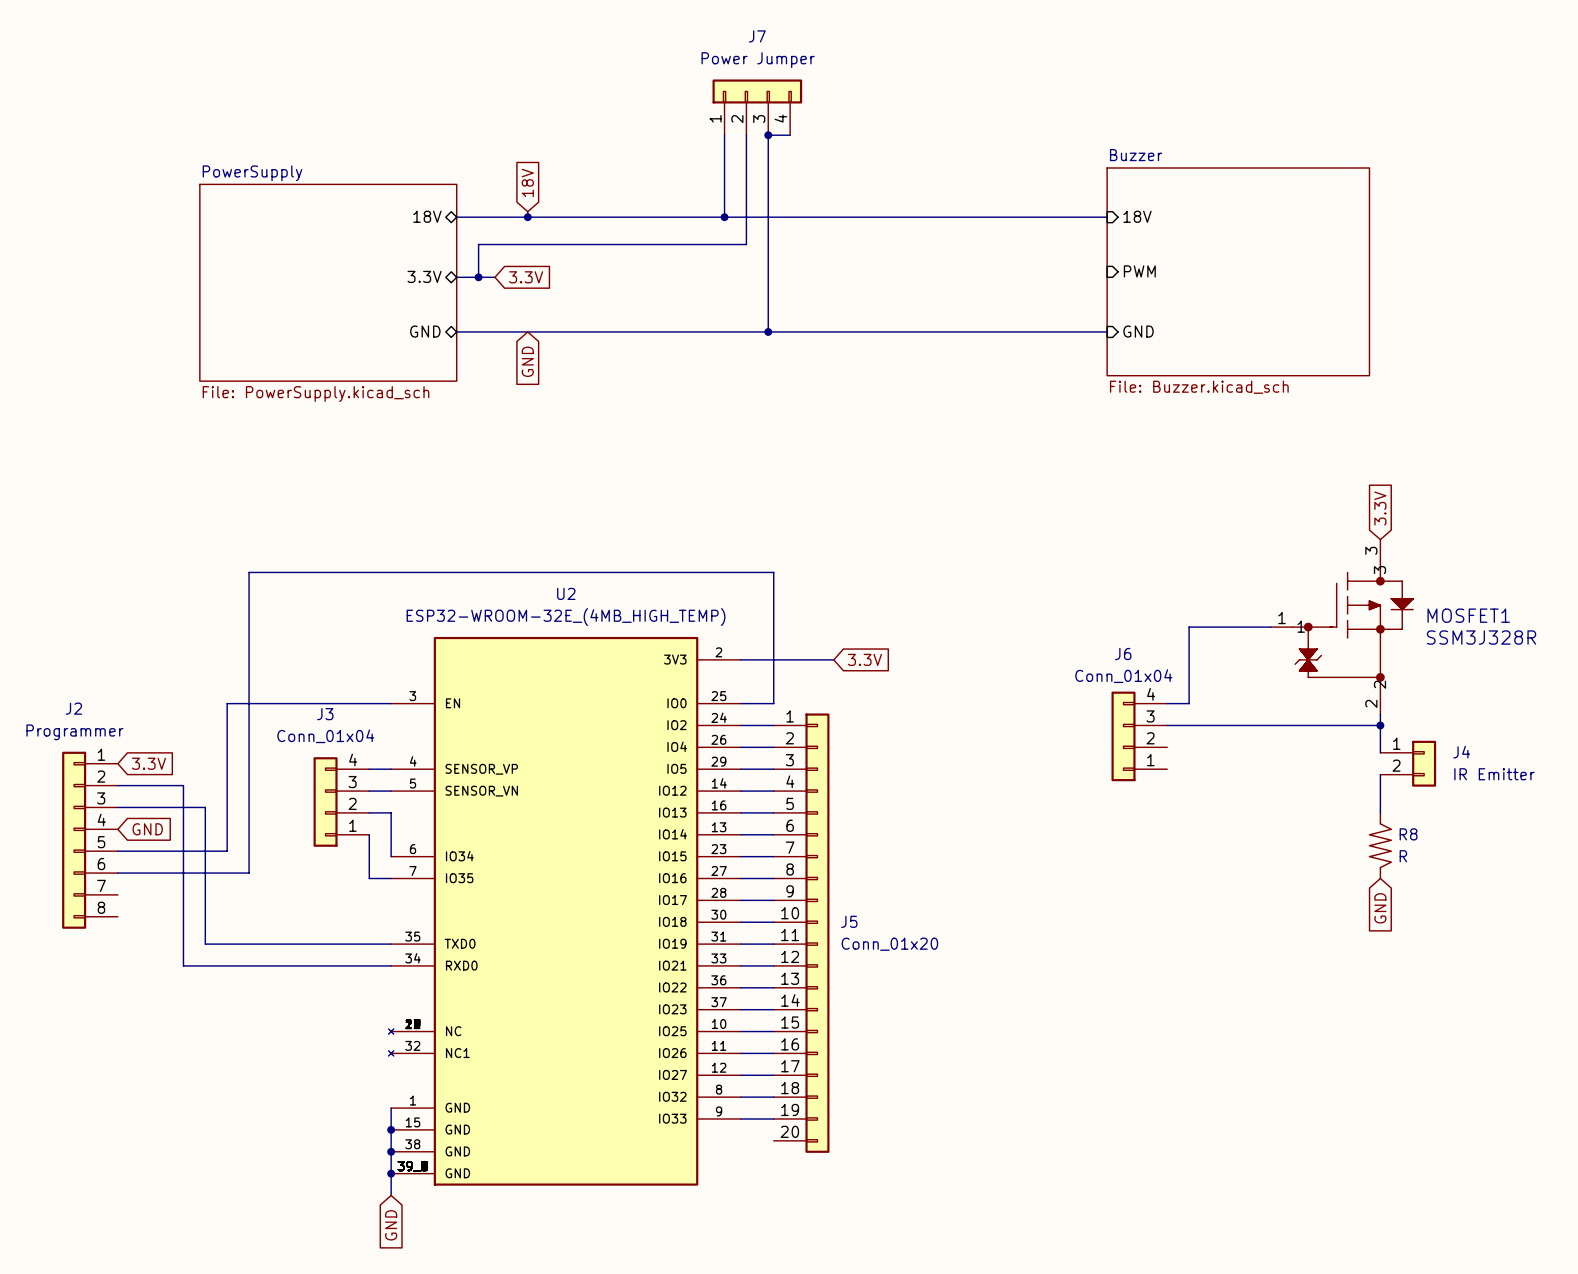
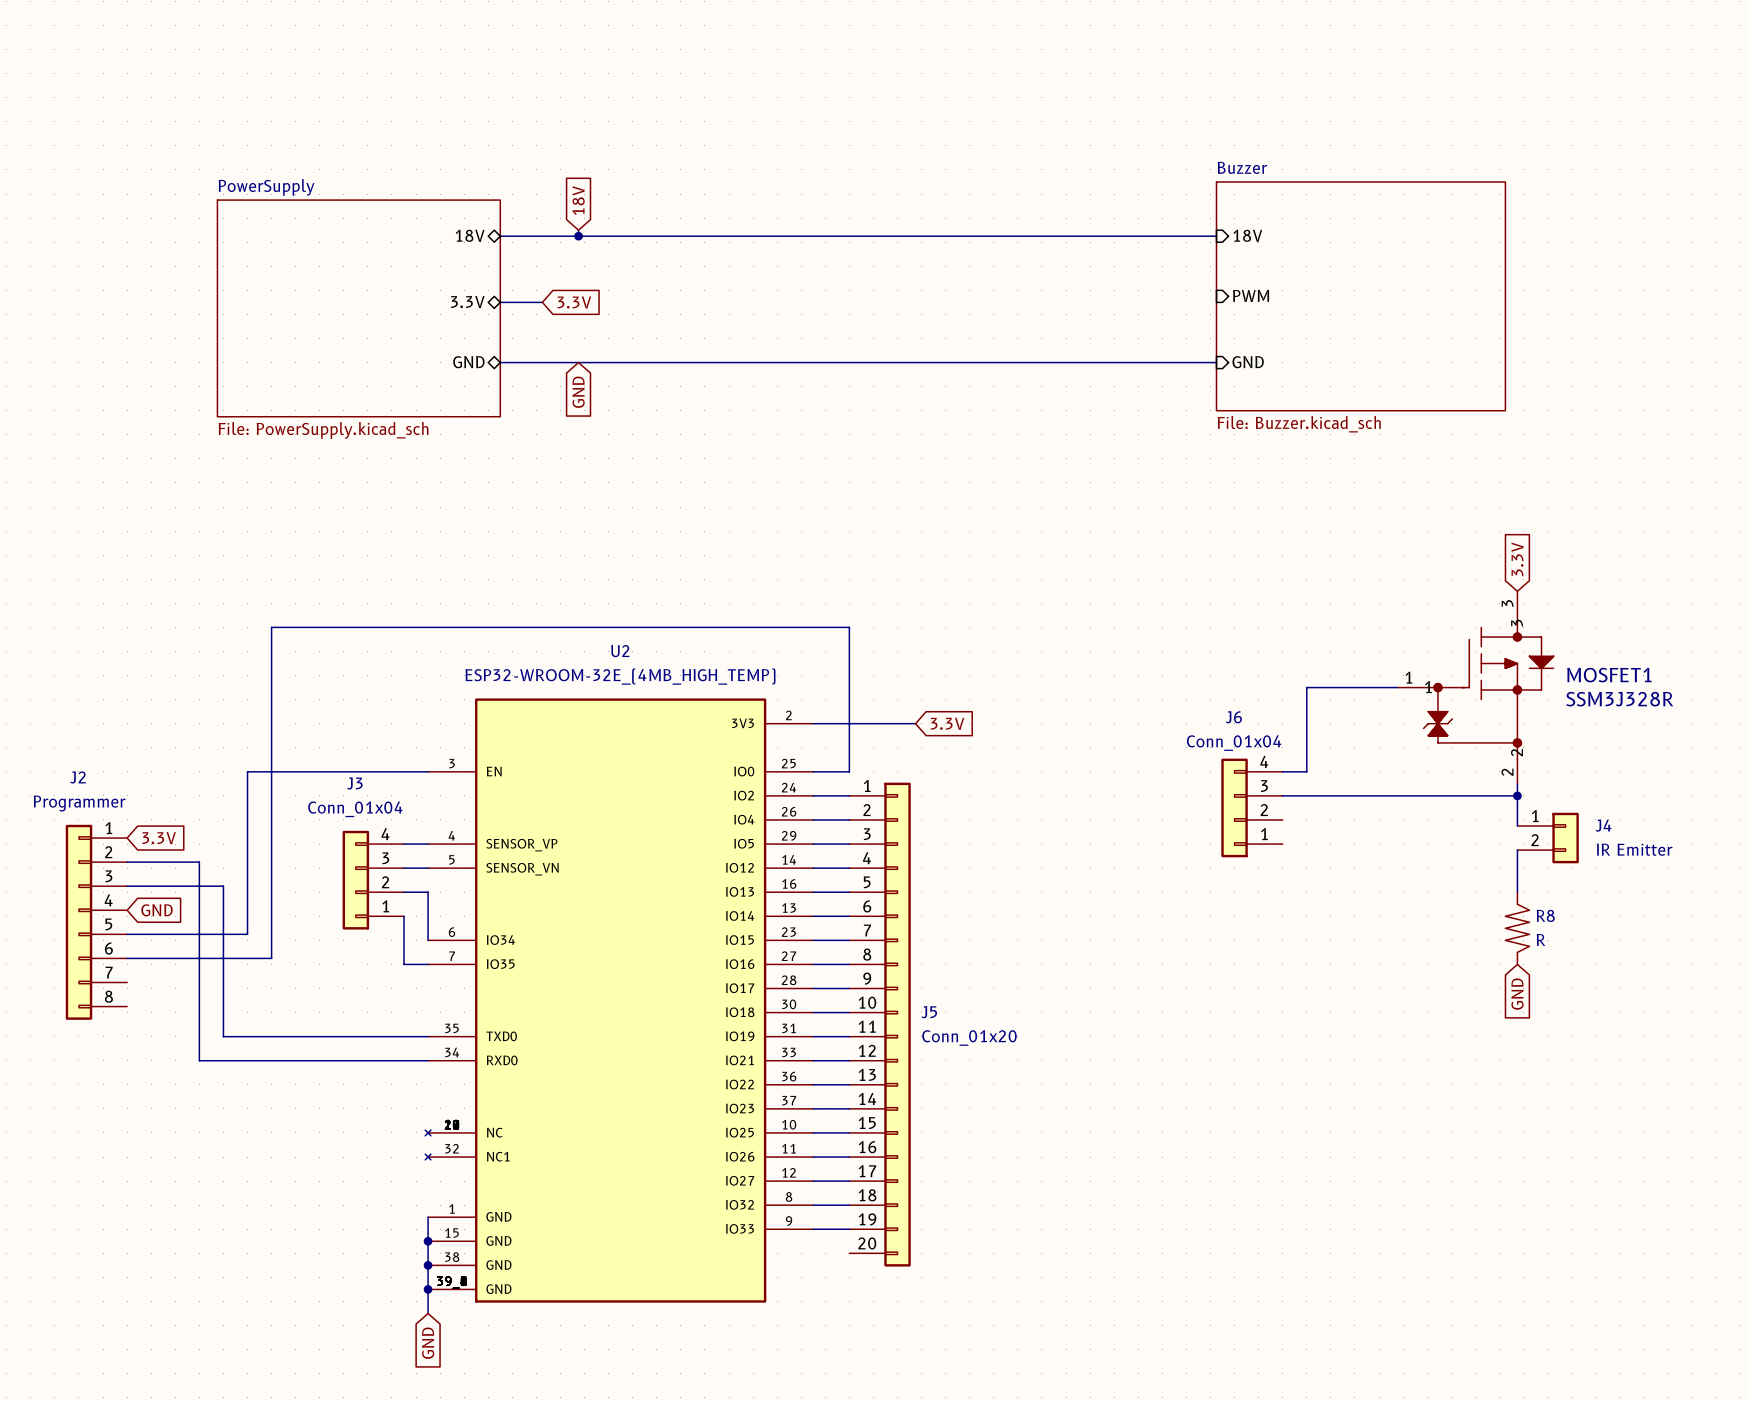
J7: Power Jumper (757, 107) -> none
wire: (724, 135) (724, 217) -> none
wire: (746, 135) (746, 244) (478, 244) (478, 277) -> none
junction: (768, 135) -> none
wire: (790, 135) (768, 135) (768, 331) -> none
junction: (724, 217) -> none
junction: (478, 277) -> none
junction: (768, 331) -> none

